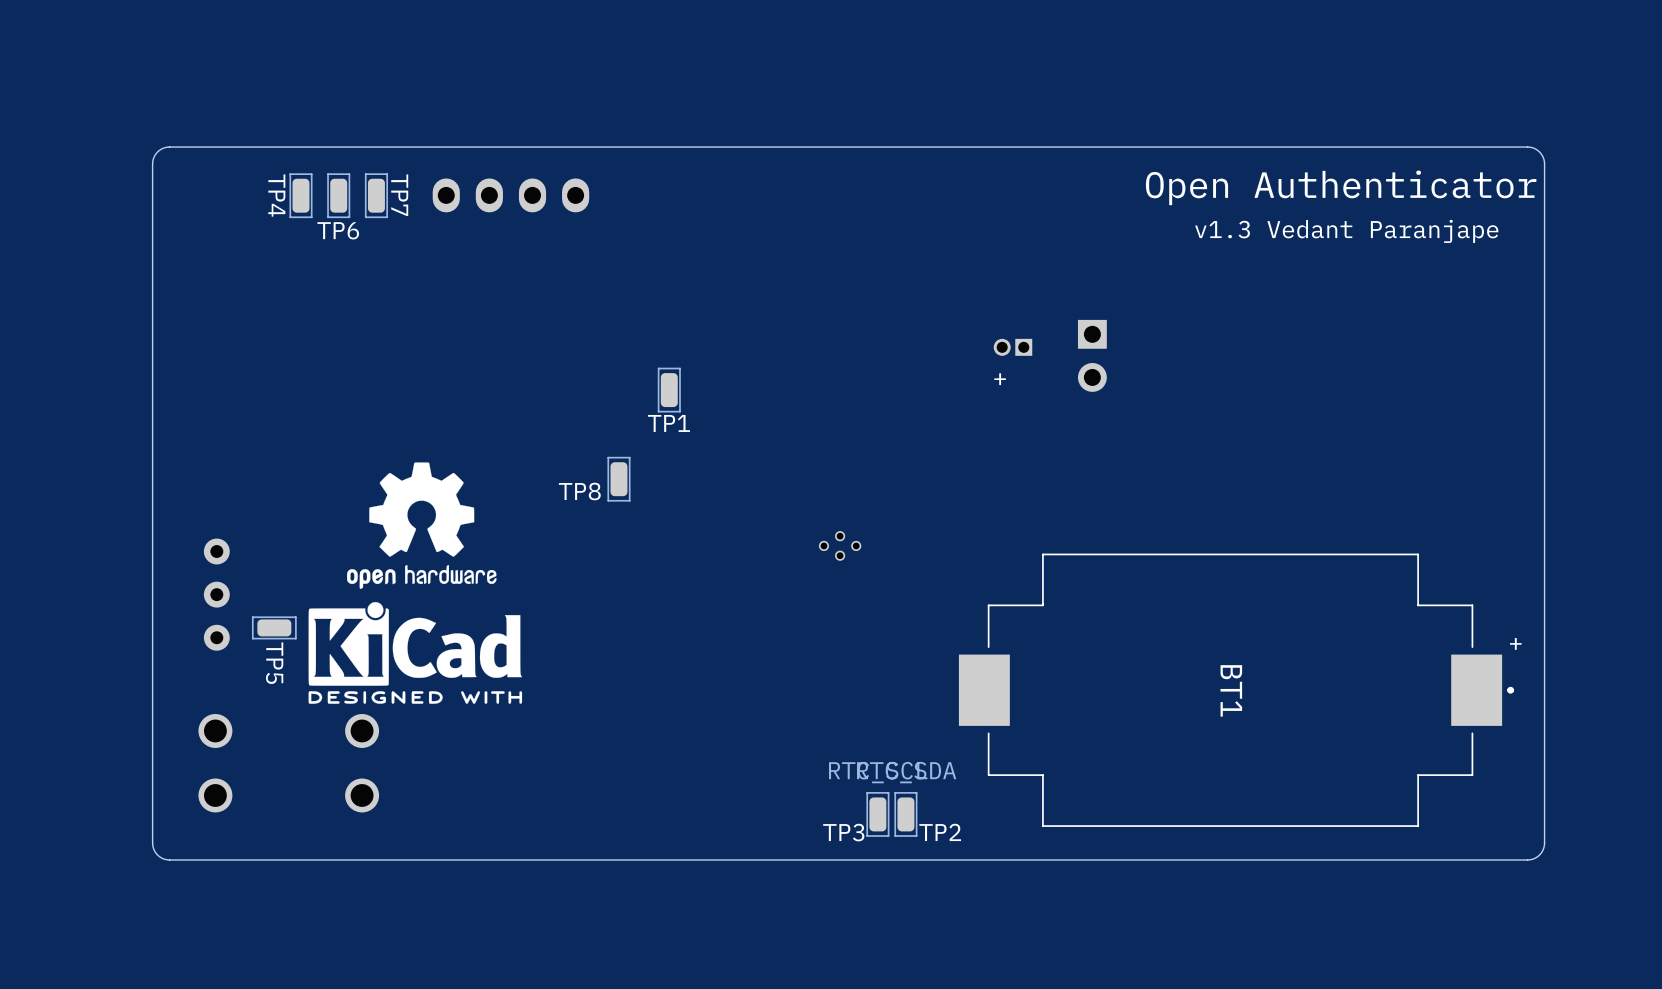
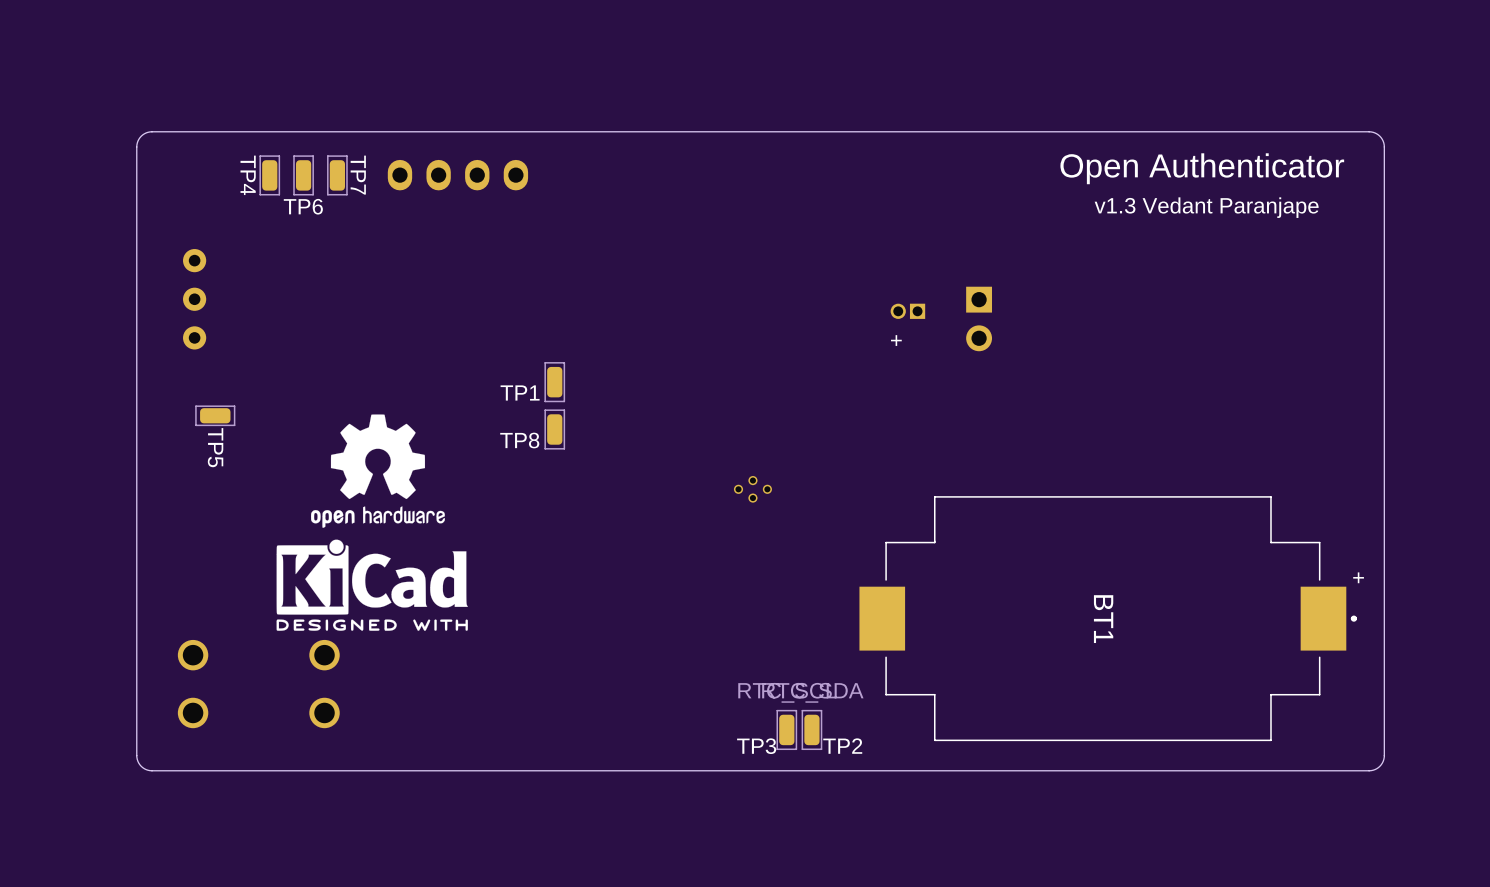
TP1 position: (669, 390) -> (554, 382)
TP1 name position: TP1 (668, 423) -> TP1 (520, 392)
part position: (216, 594) -> (194, 299)
TP5 position: (274, 627) -> (215, 415)

